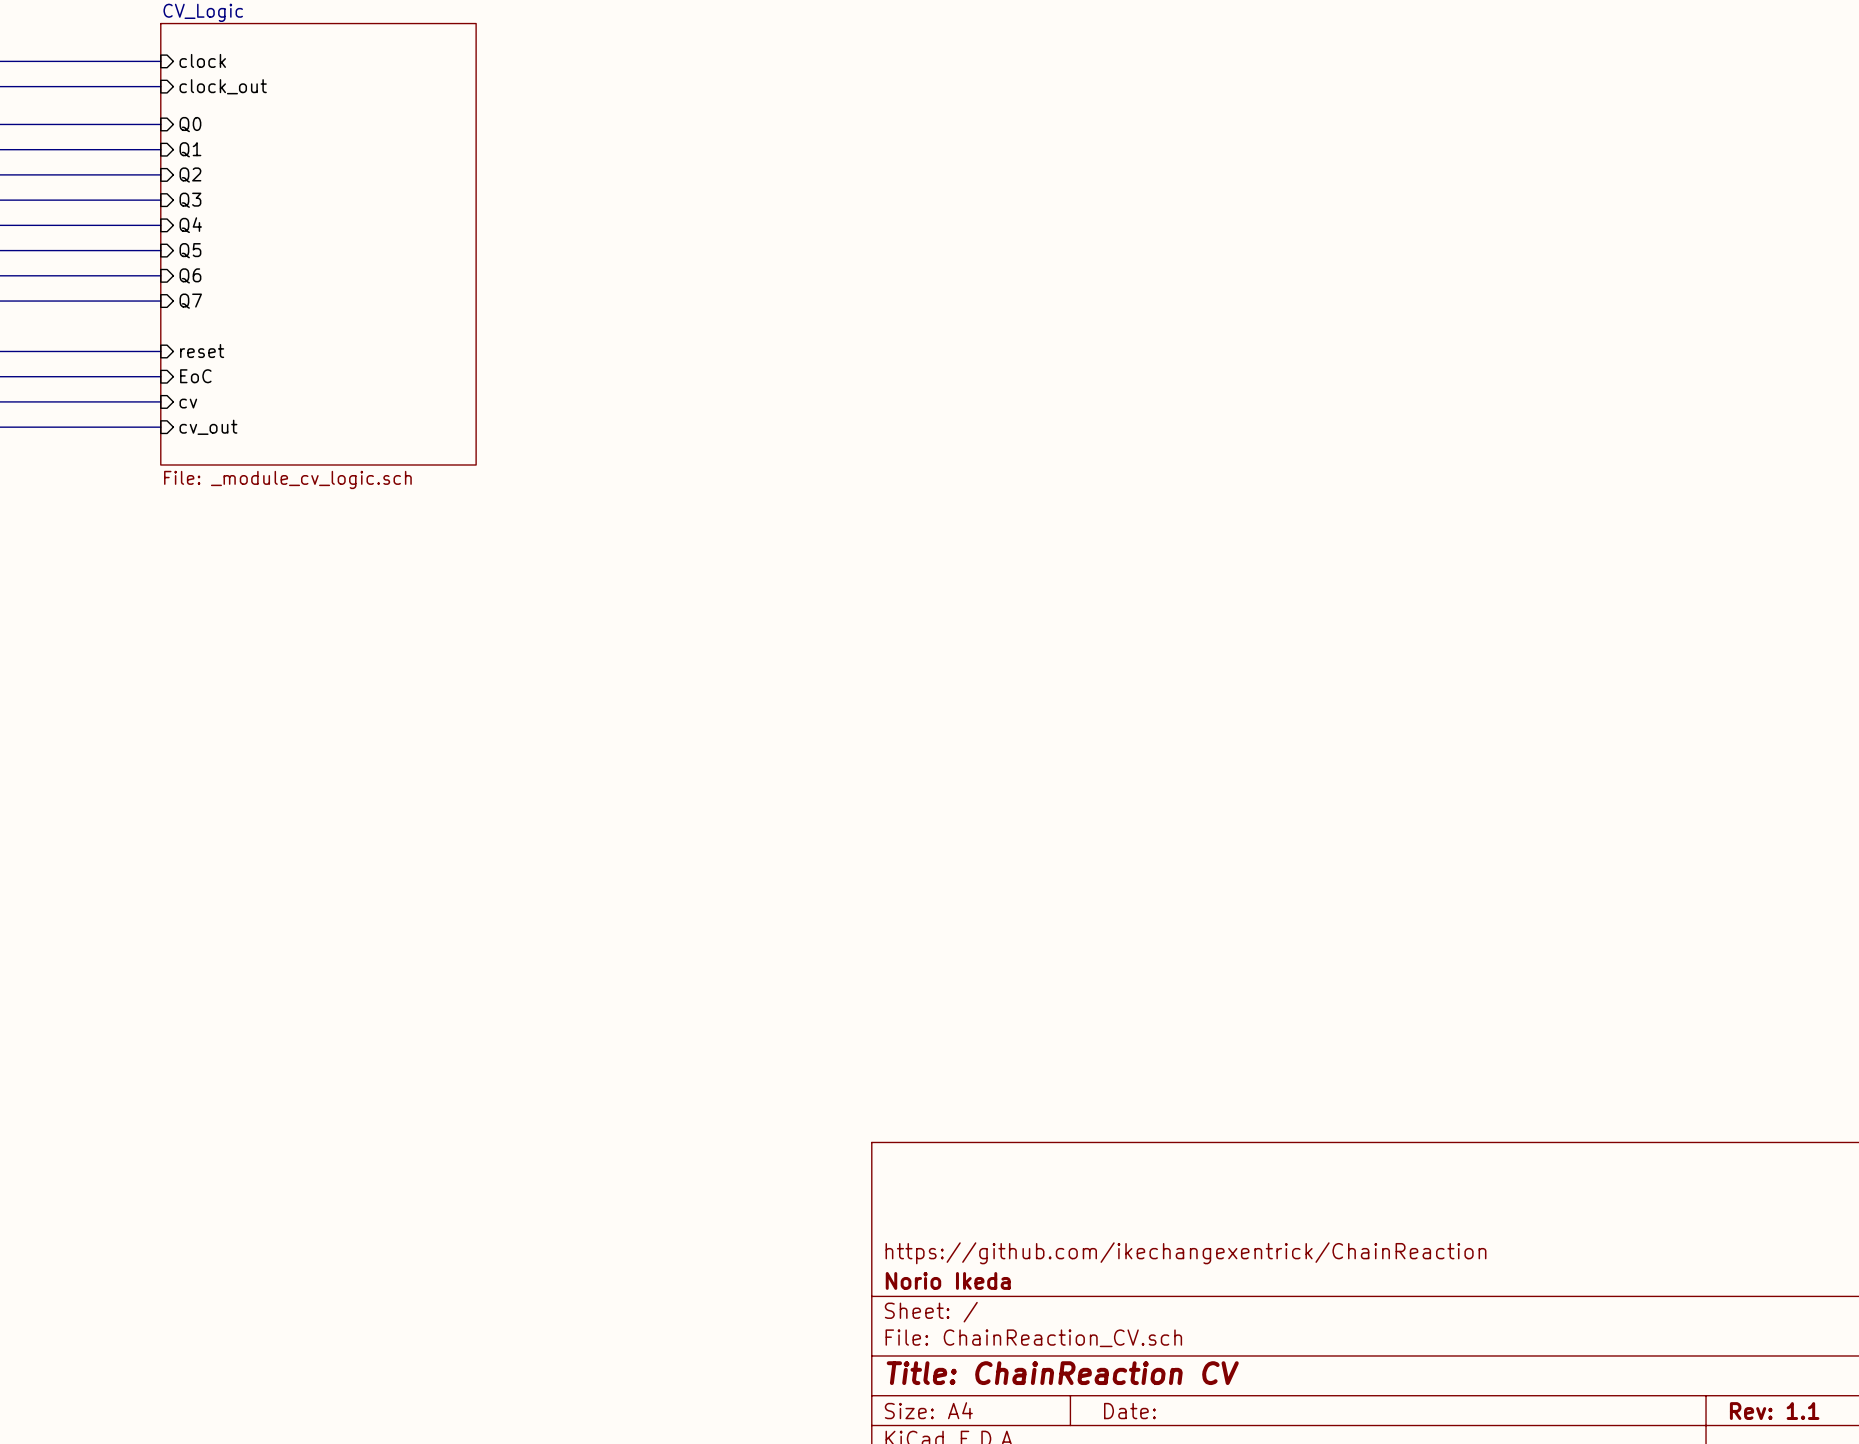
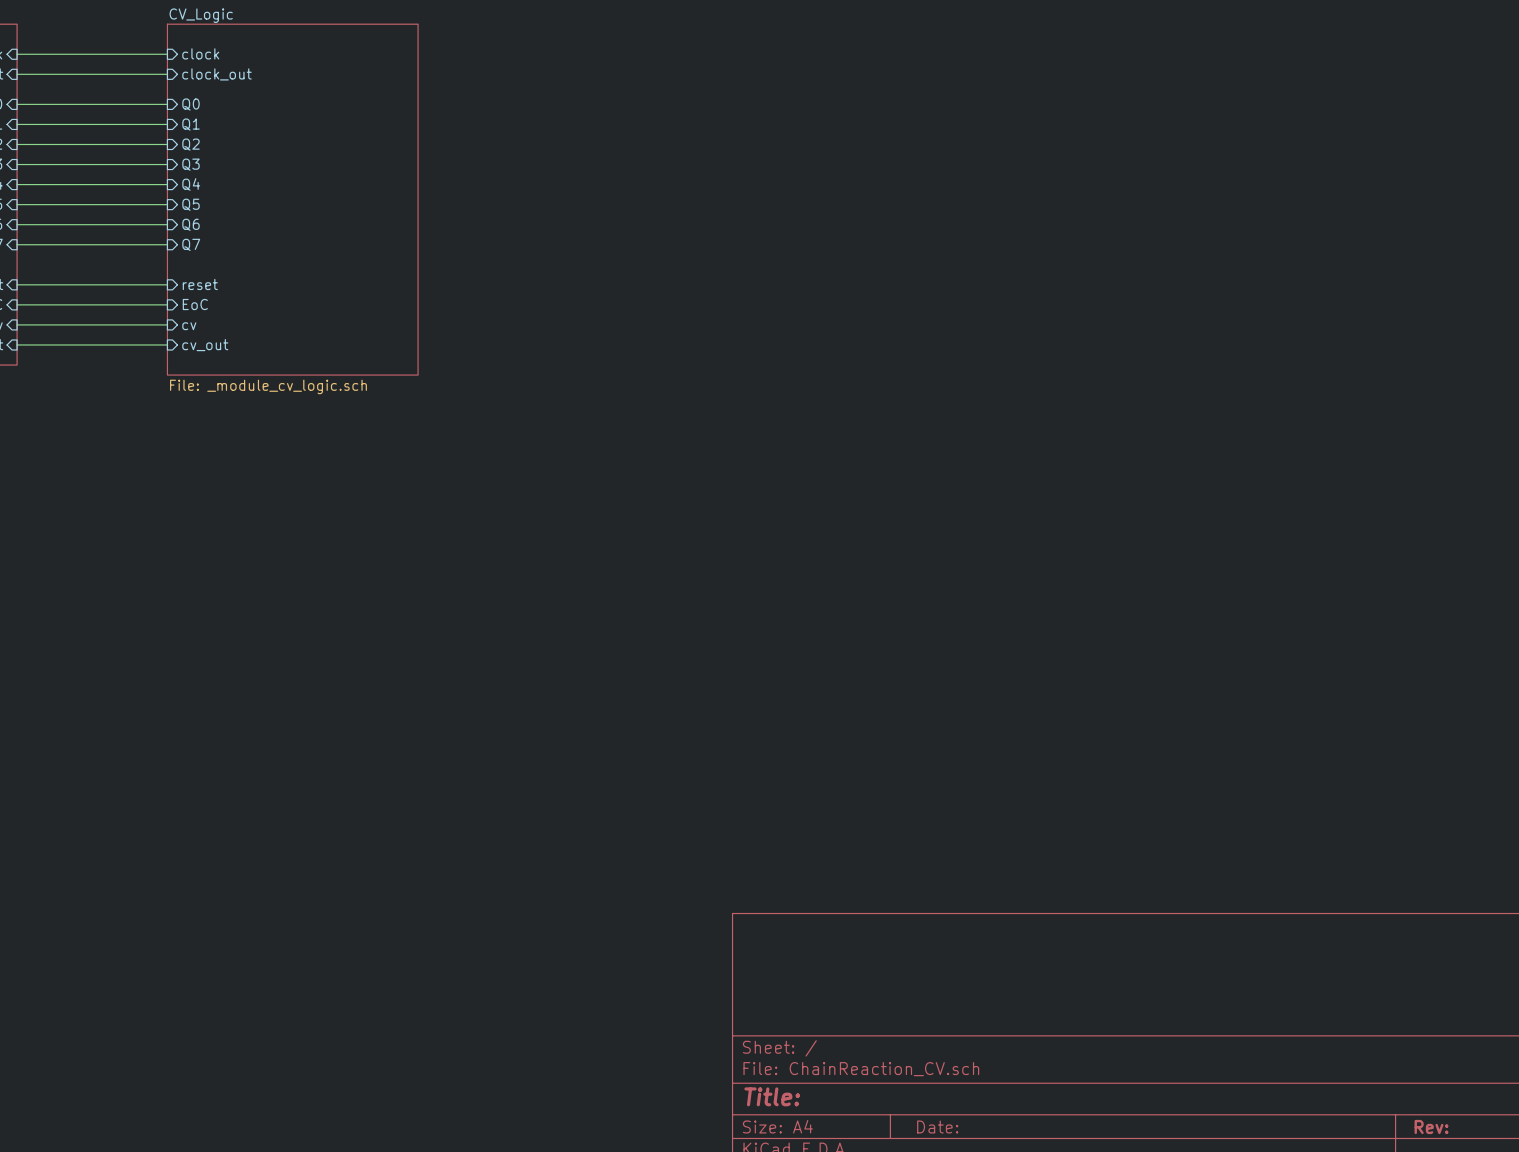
title block: https://github.com/ikechangexentrick/ChainReaction (1185, 1253) -> none
title block: Norio Ikeda (948, 1280) -> none
title block: Title: ChainReaction CV (1062, 1373) -> Title: (772, 1096)
title block: Rev: 1.1 (1774, 1411) -> Rev: (1431, 1126)

